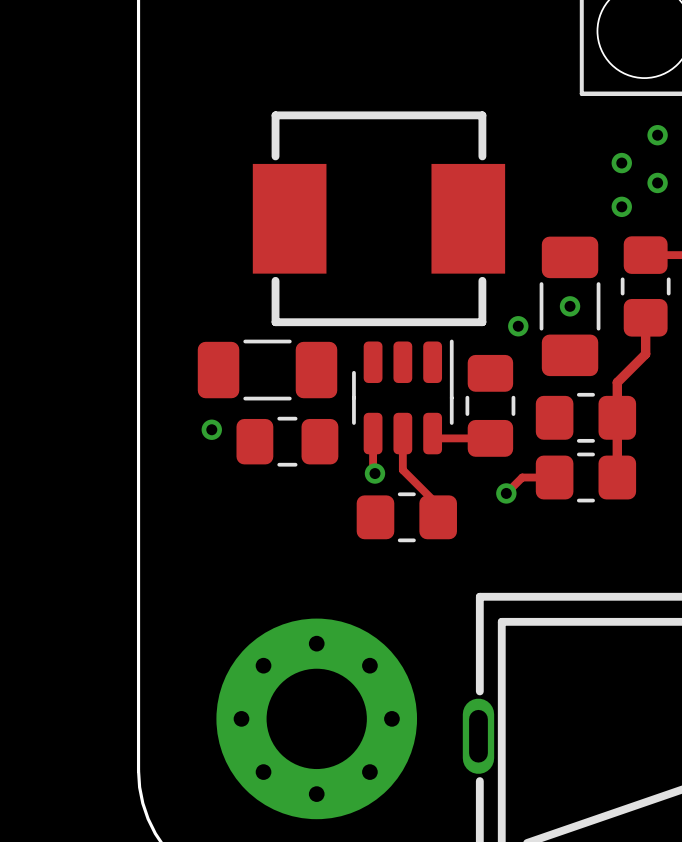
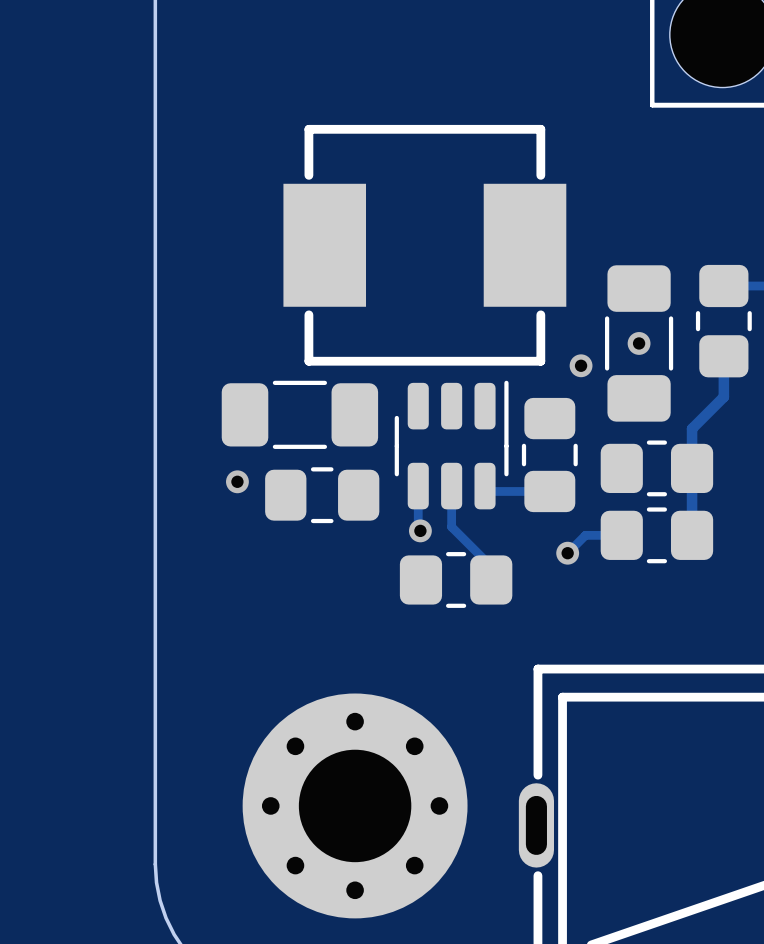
via: (657, 135) -> none
via: (621, 163) -> none
via: (657, 182) -> none
via: (621, 206) -> none

